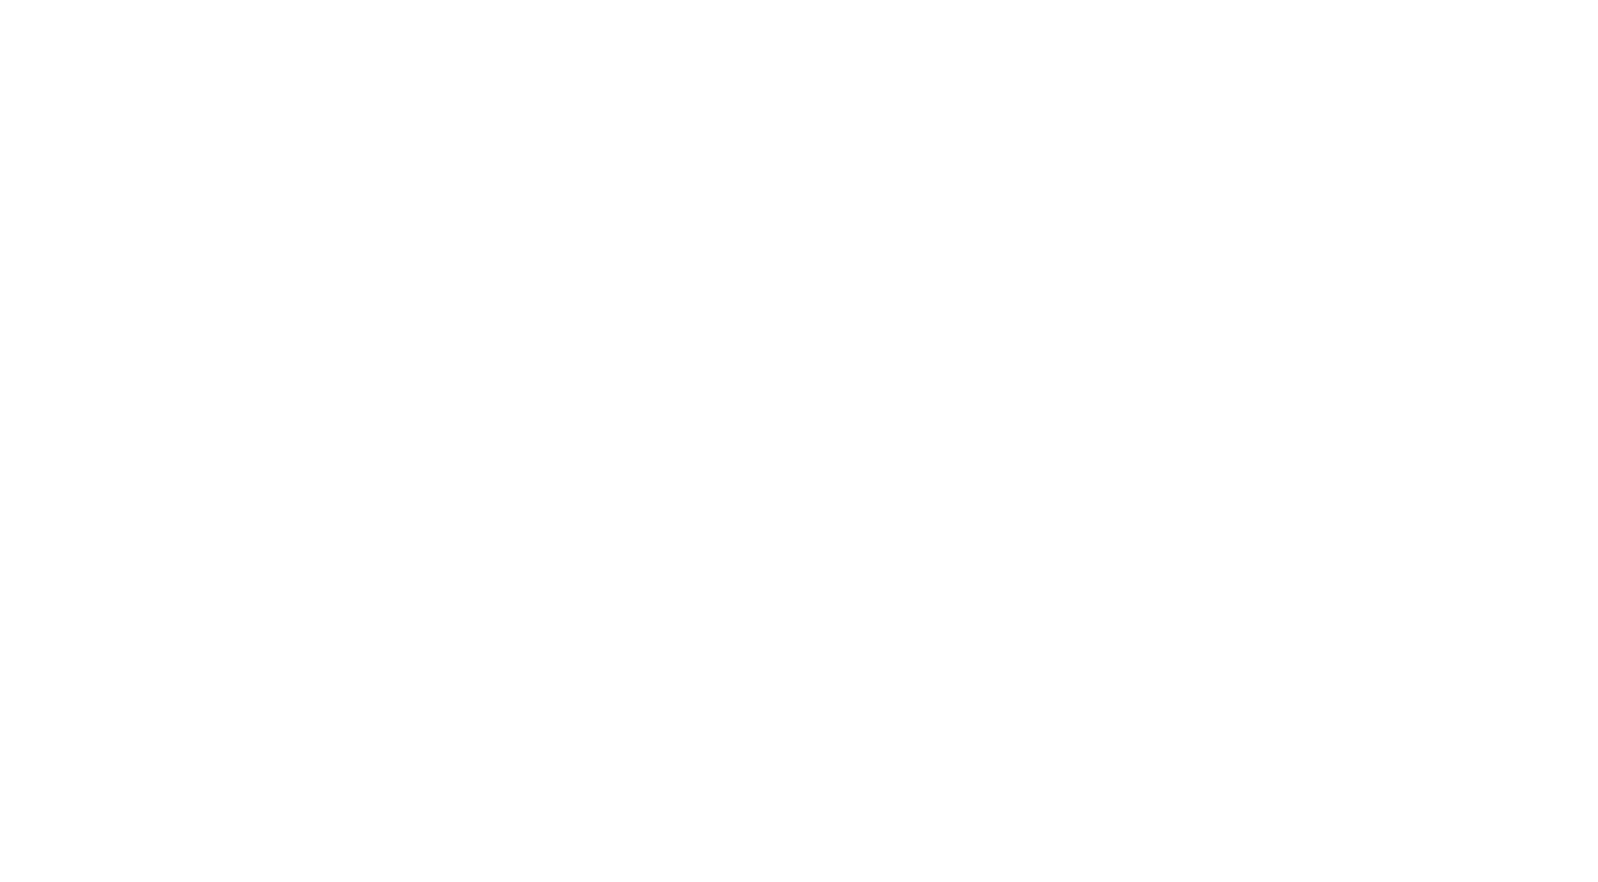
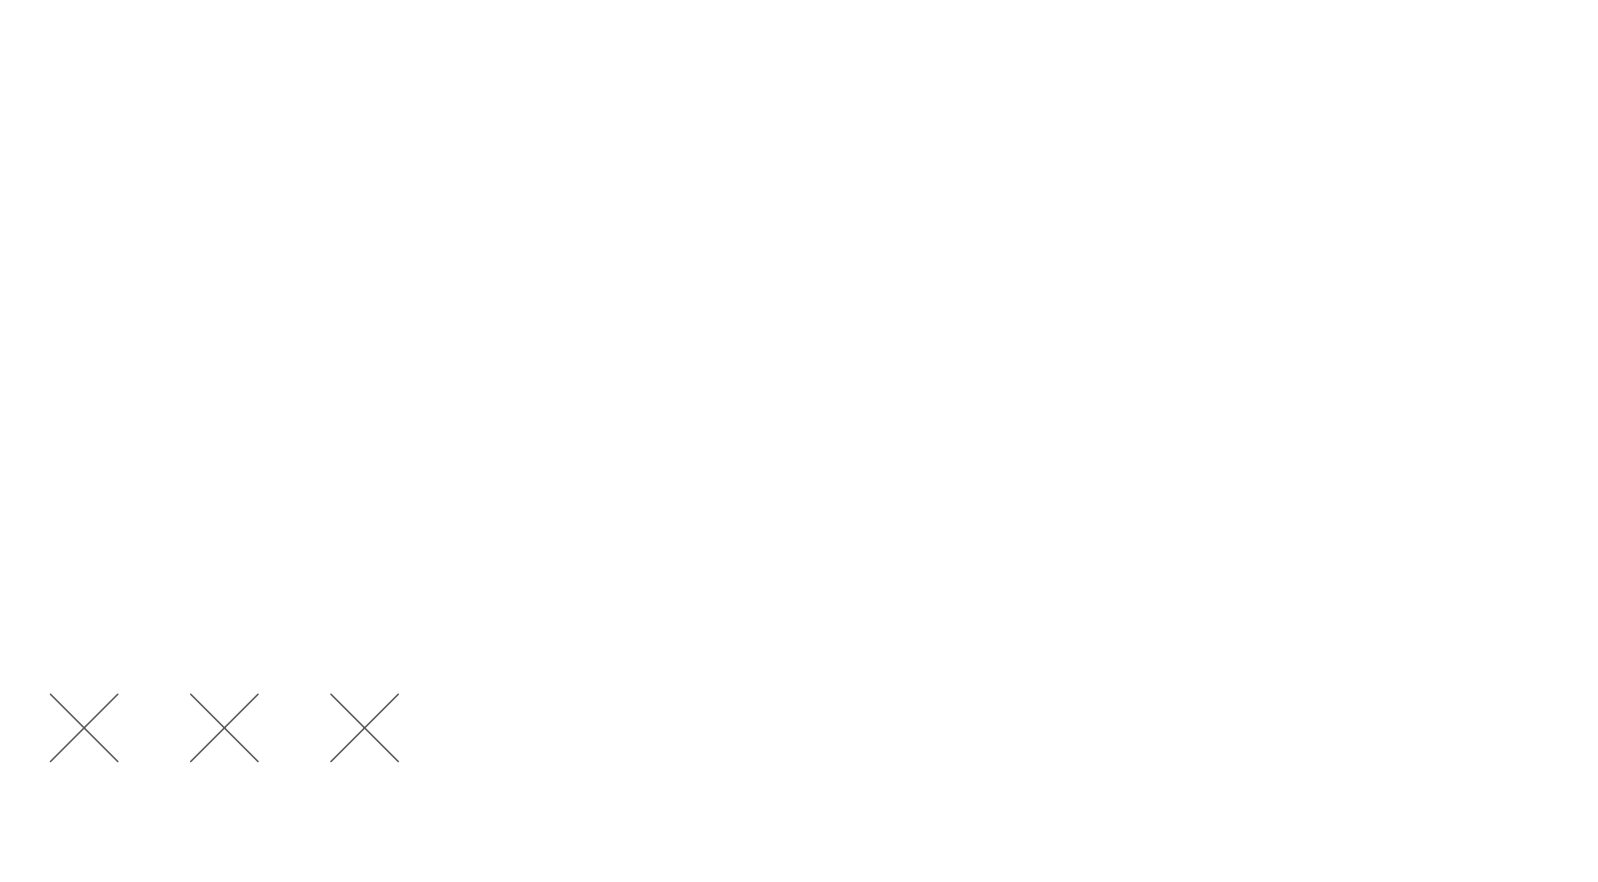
no-connect mark: none -> (84, 727)
no-connect mark: none -> (224, 727)
no-connect mark: none -> (364, 727)

